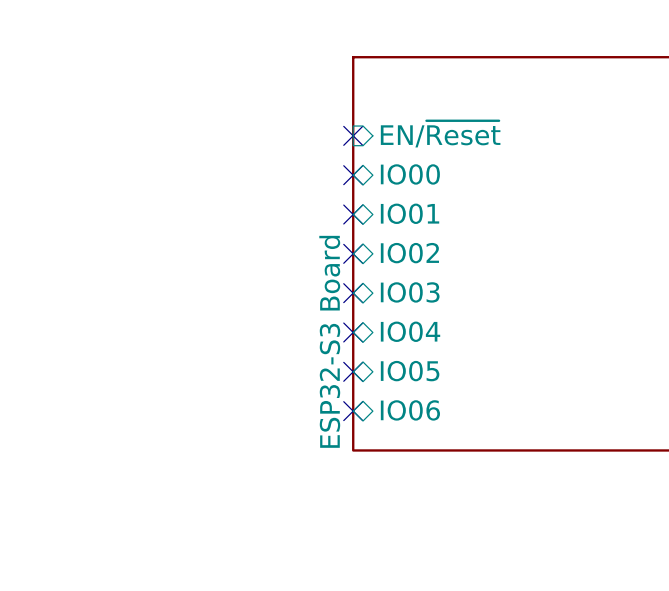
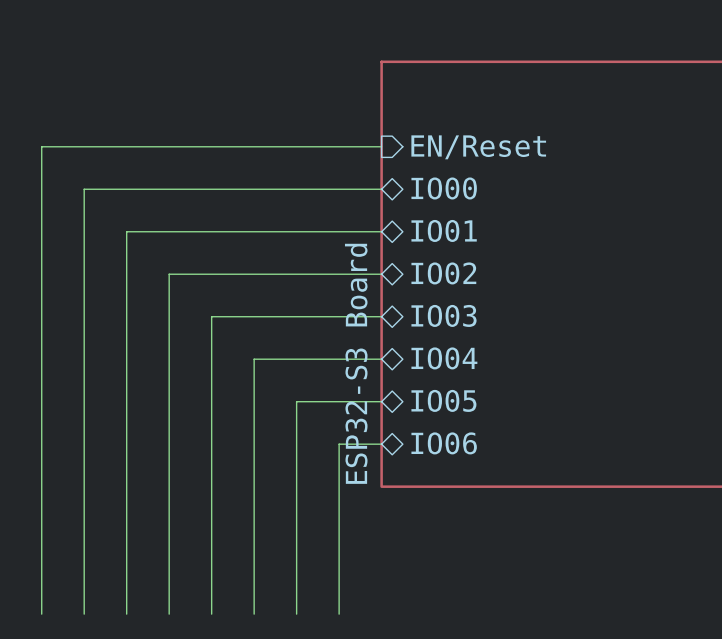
sheet pin: EN/~{Reset} (440, 134) -> EN/Reset (478, 147)
wire: none -> (381, 146) (41, 146) (41, 614)
no-connect mark: (353, 135) -> none
wire: none -> (381, 189) (84, 189) (84, 614)
no-connect mark: (353, 175) -> none
wire: none -> (381, 231) (126, 231) (126, 614)
no-connect mark: (353, 214) -> none
wire: none -> (381, 274) (169, 274) (169, 614)
no-connect mark: (353, 253) -> none
wire: none -> (381, 316) (211, 316) (211, 614)
no-connect mark: (353, 293) -> none
wire: none -> (381, 359) (254, 359) (254, 614)
no-connect mark: (353, 332) -> none
wire: none -> (381, 401) (296, 401) (296, 614)
no-connect mark: (353, 371) -> none
wire: none -> (381, 444) (339, 444) (339, 614)
no-connect mark: (353, 411) -> none

